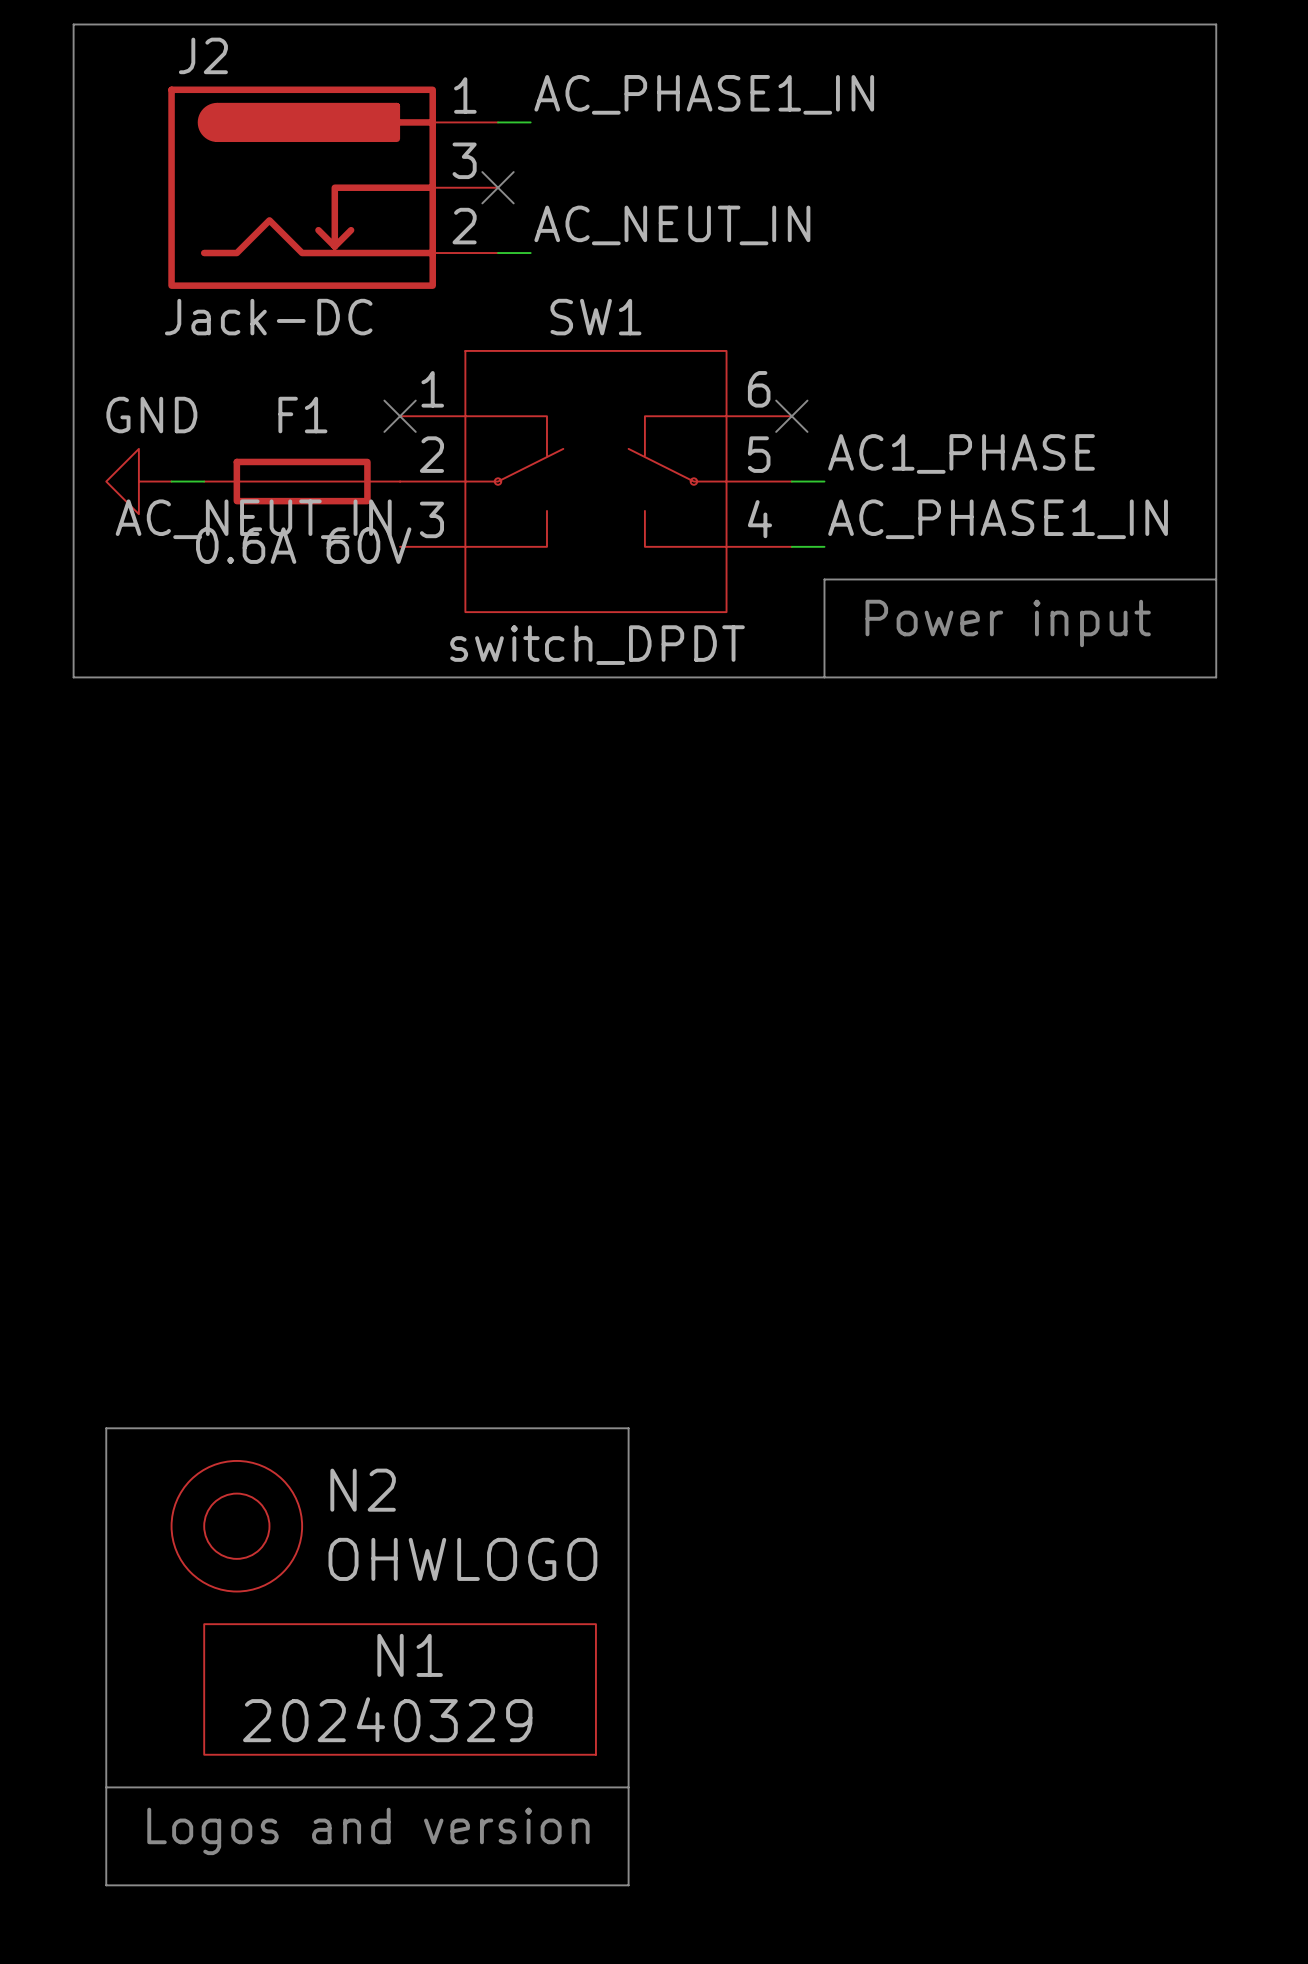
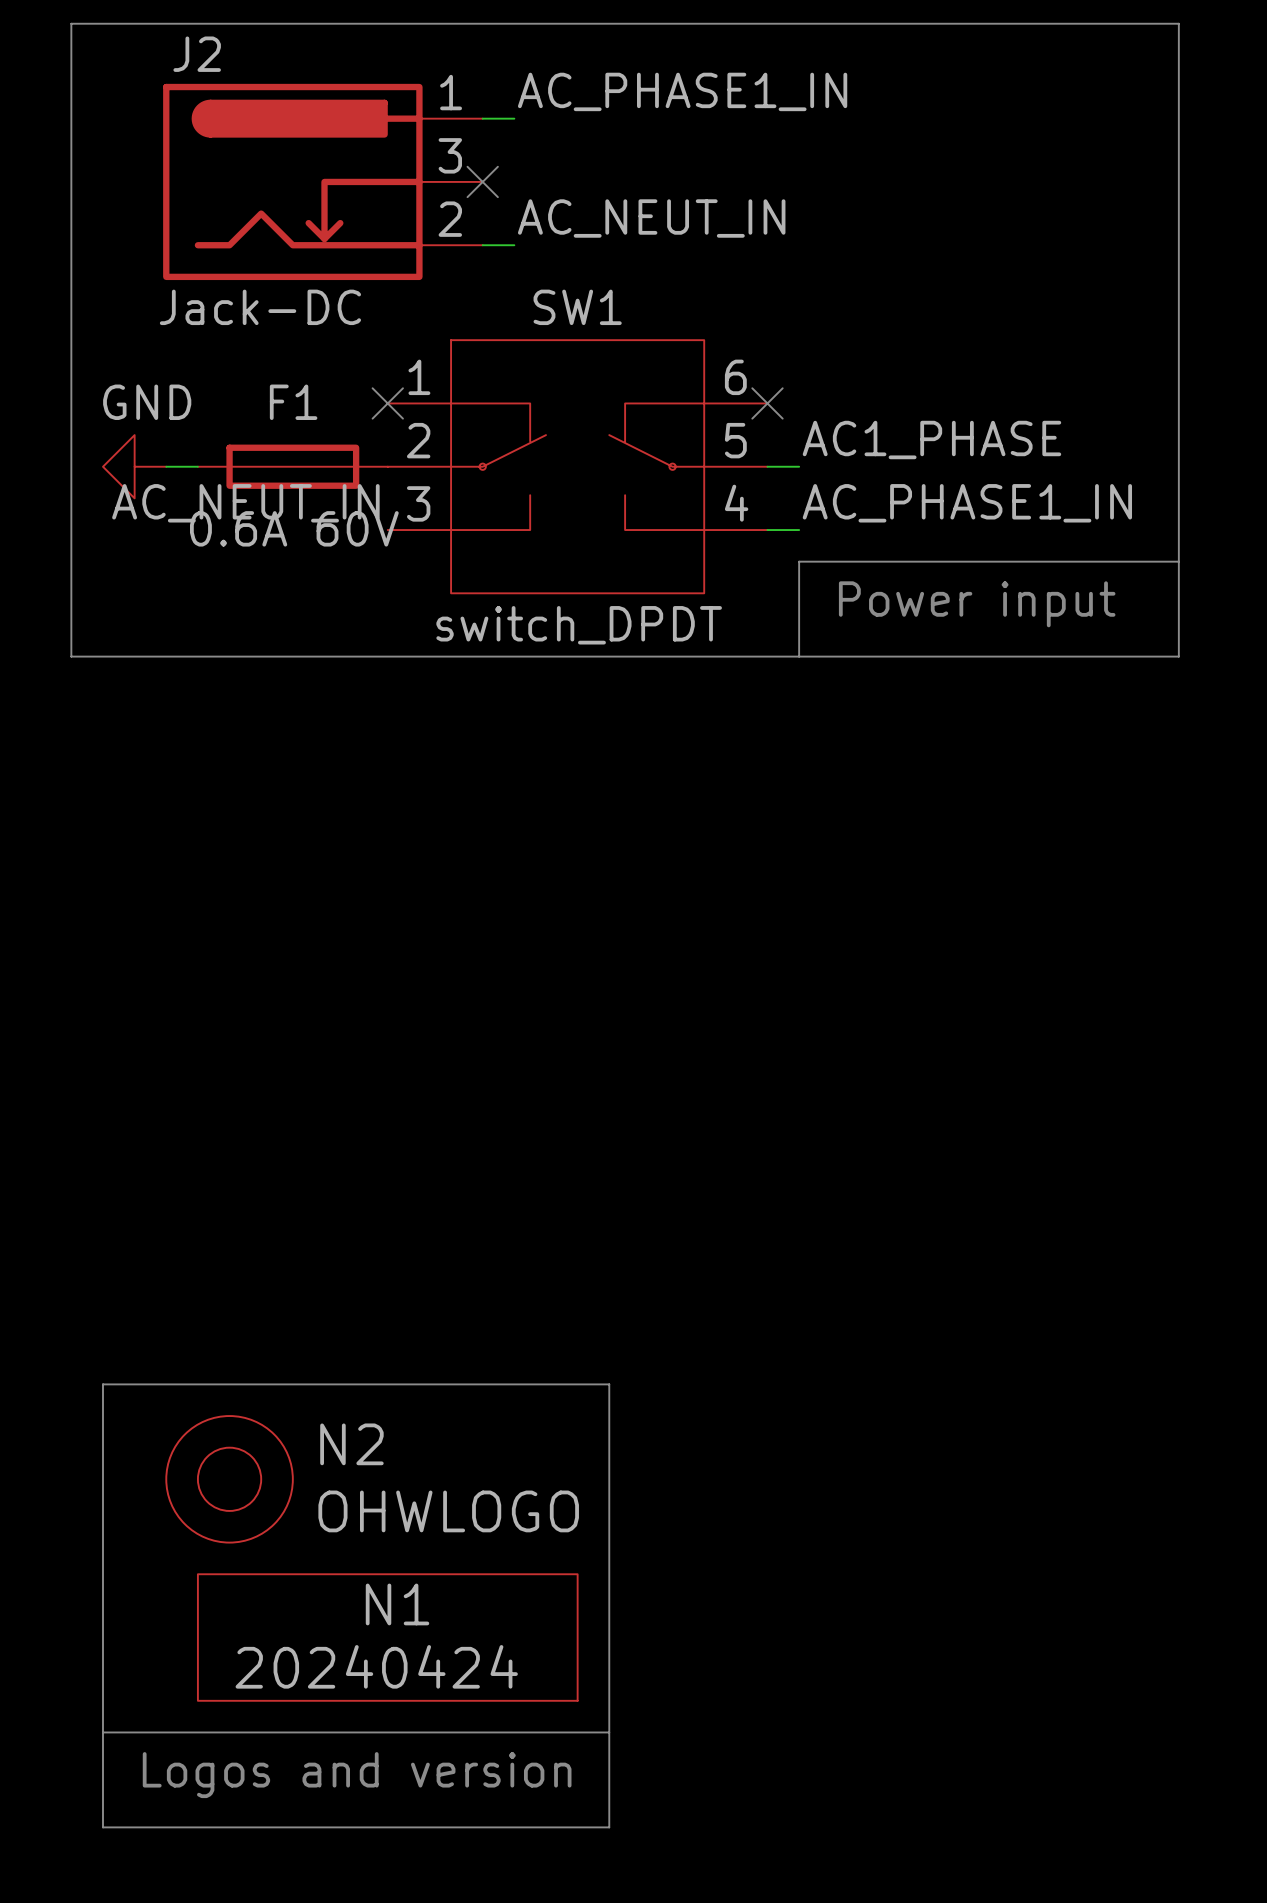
N1 value: 20240329 (387, 1719) -> 20240424 (376, 1666)

